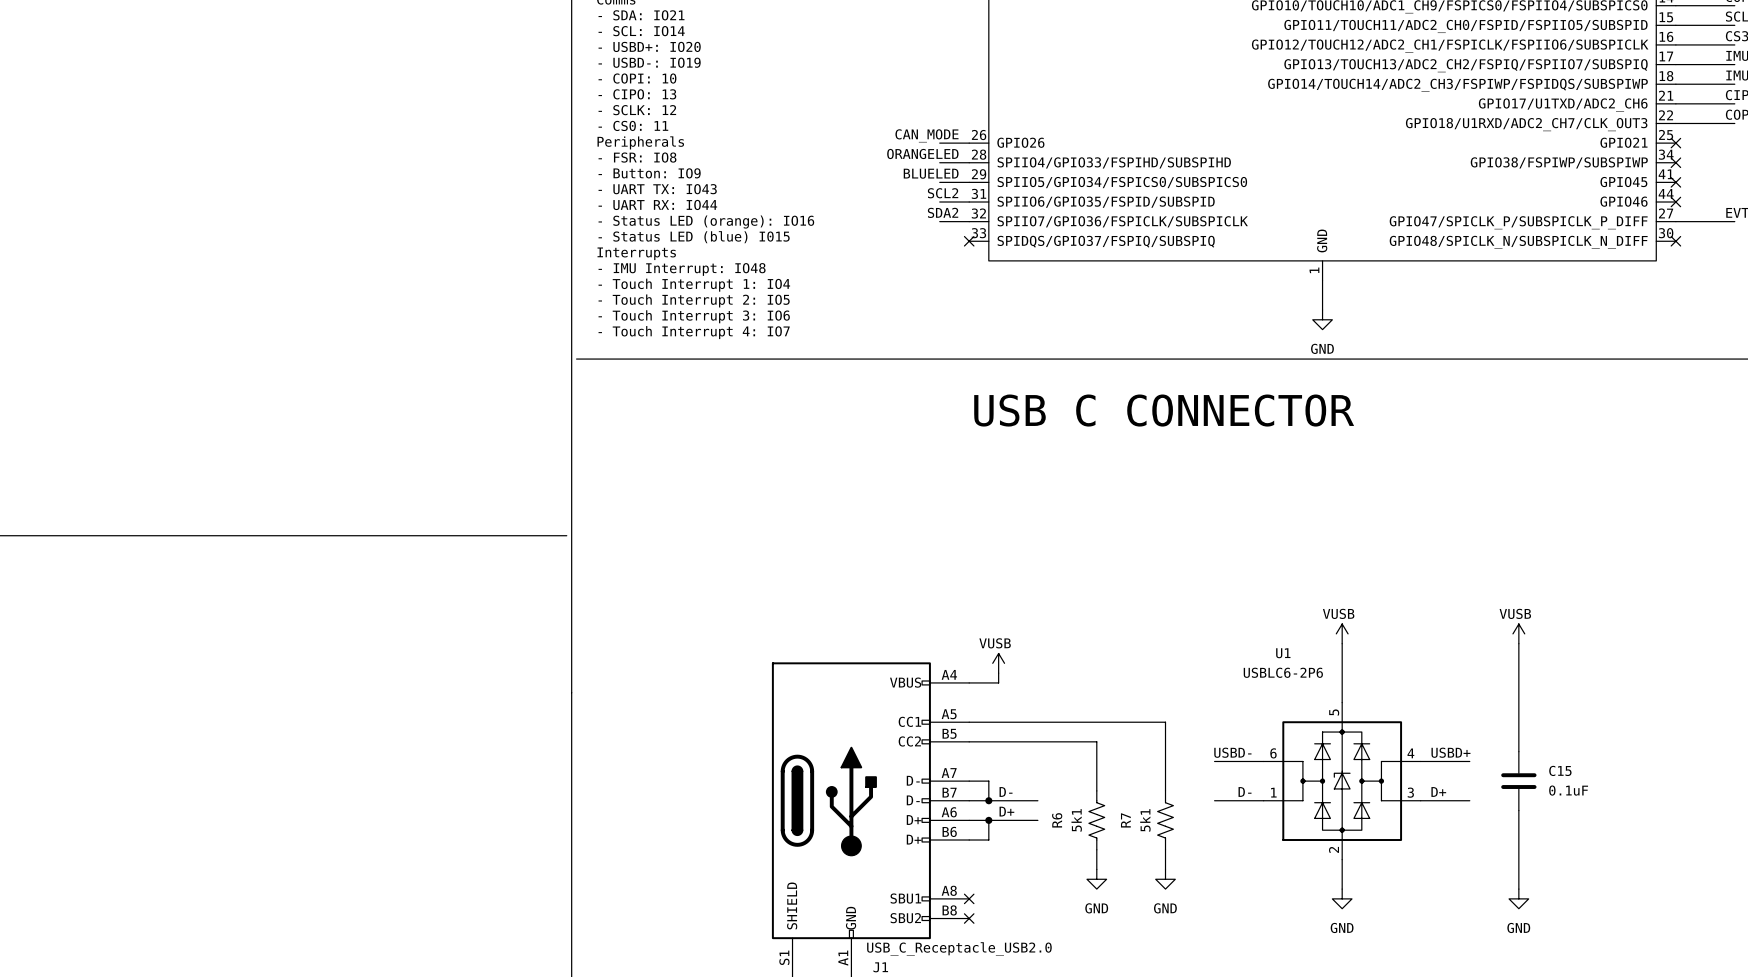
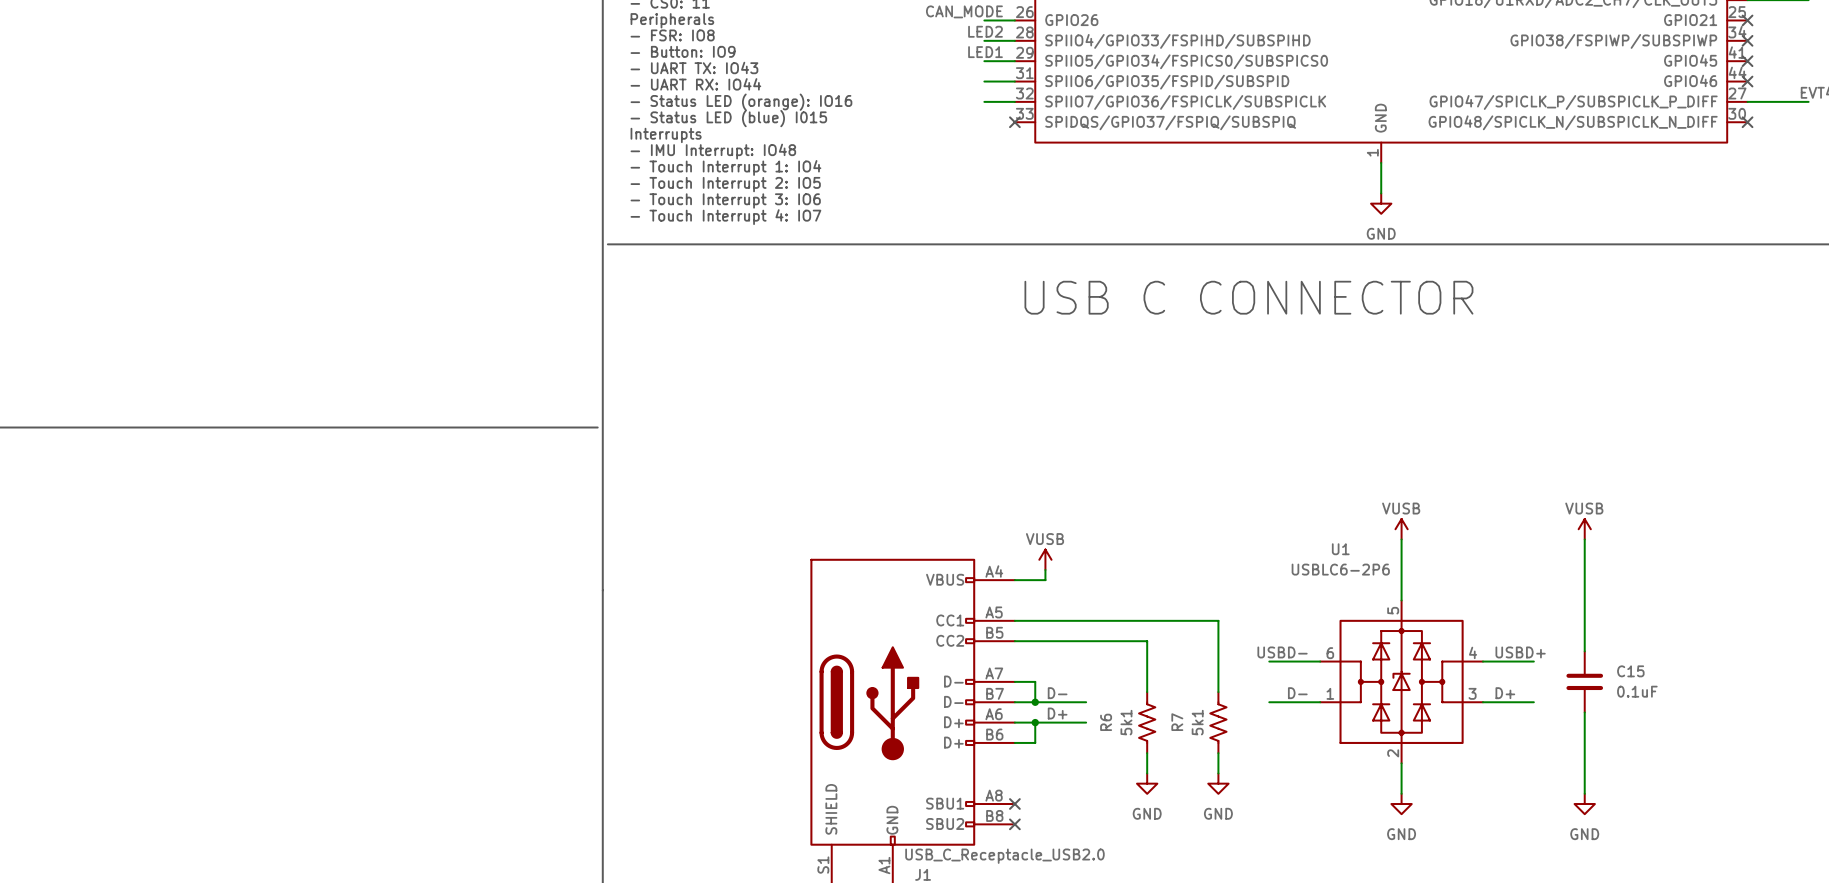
label: ORANGELED (922, 153) -> LED2 (985, 31)
label: BLUELED (931, 173) -> LED1 (985, 52)
label: SCL2 (943, 193) -> none
label: SDA2 (943, 212) -> none

